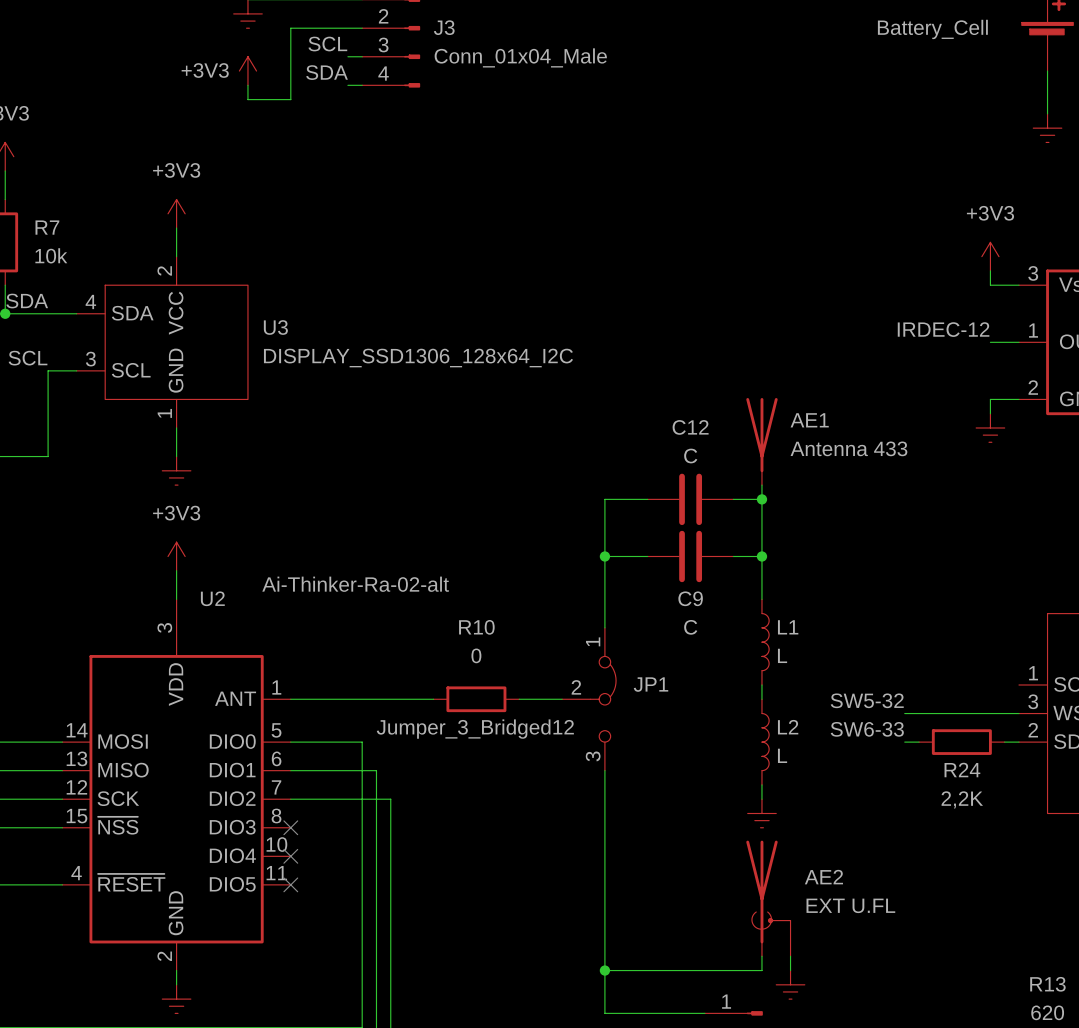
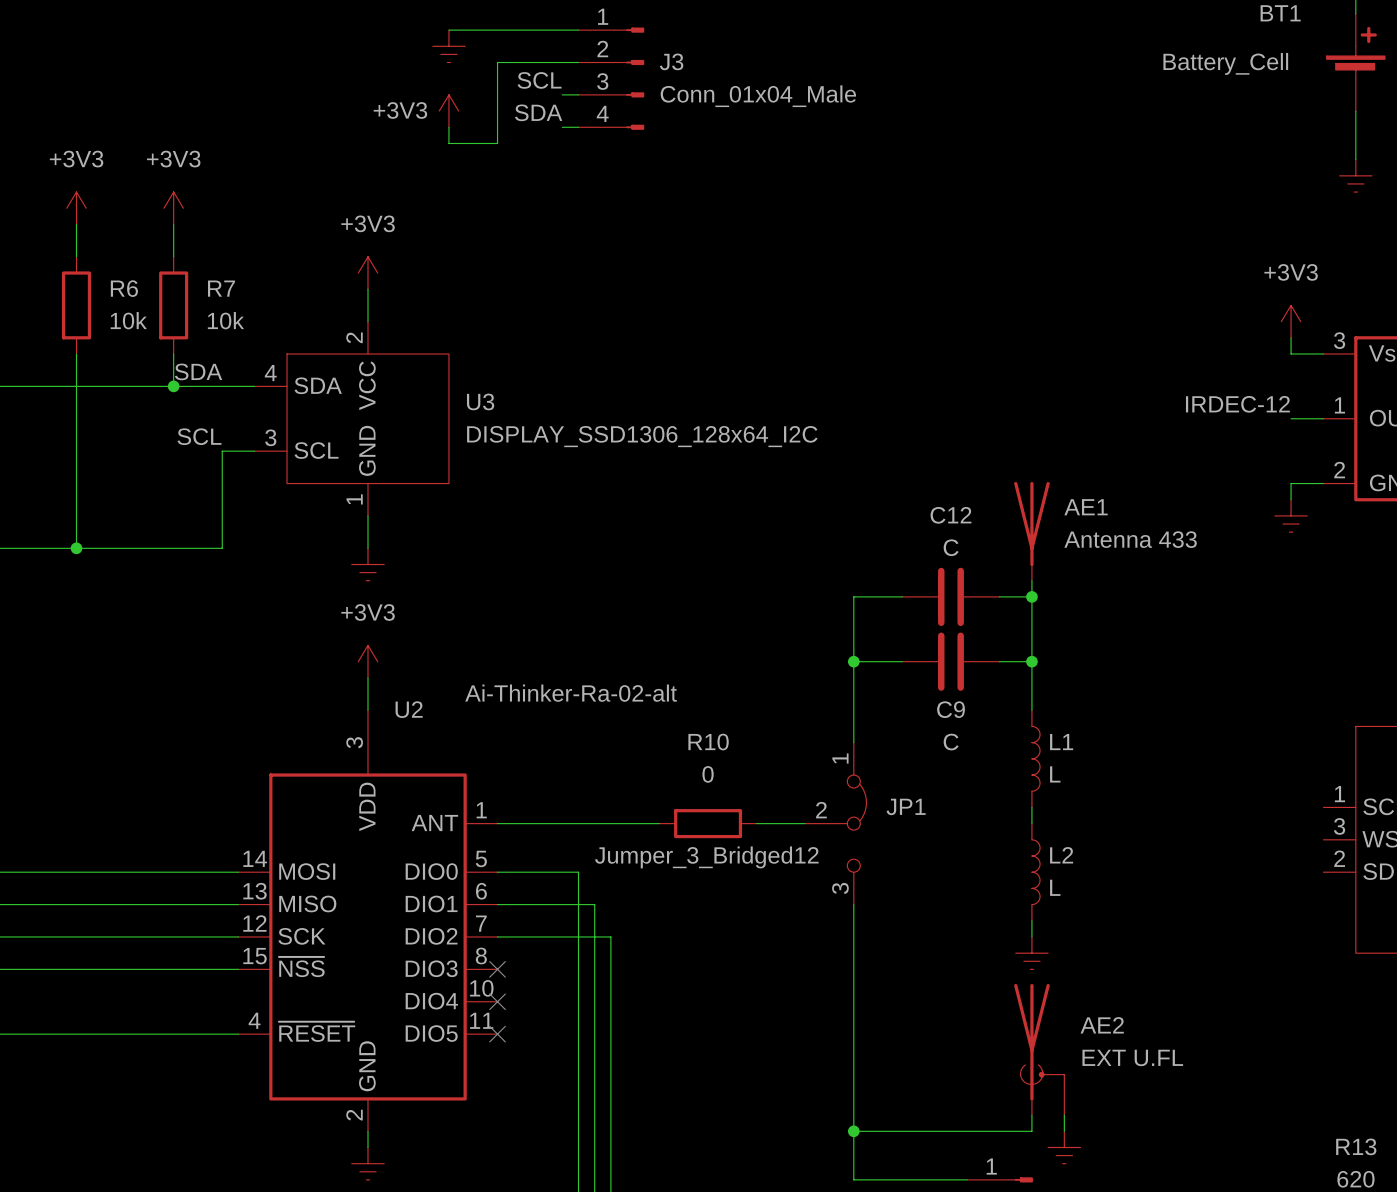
label: SW5-32 (867, 700) -> none
wire: (904, 713) (1018, 713) -> none
label: SW6-33 (867, 729) -> none
wire: (904, 742) (919, 742) -> none
R24: 2,2K (961, 742) -> none
wire: (1004, 742) (1018, 742) -> none

